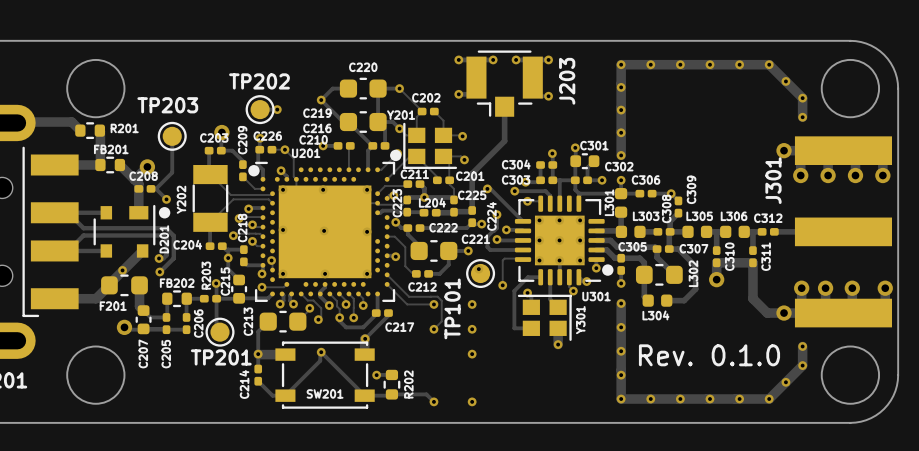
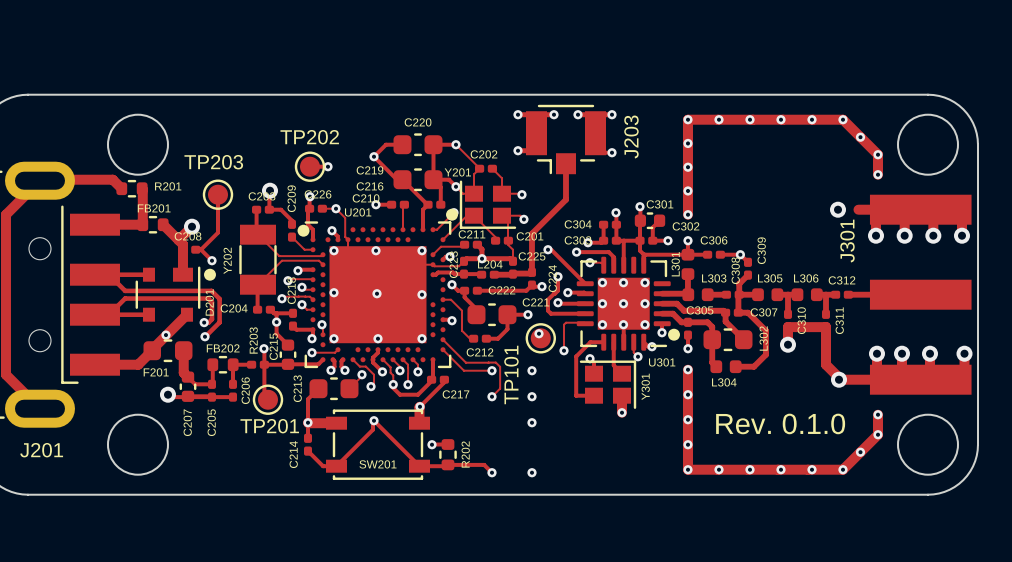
via position: (784, 150) -> (838, 209)
via position: (784, 313) -> (839, 379)

